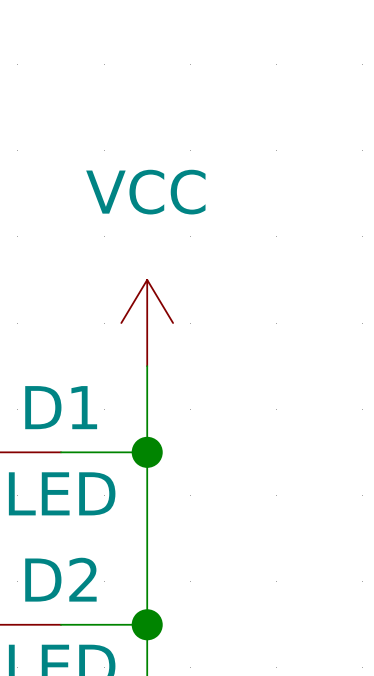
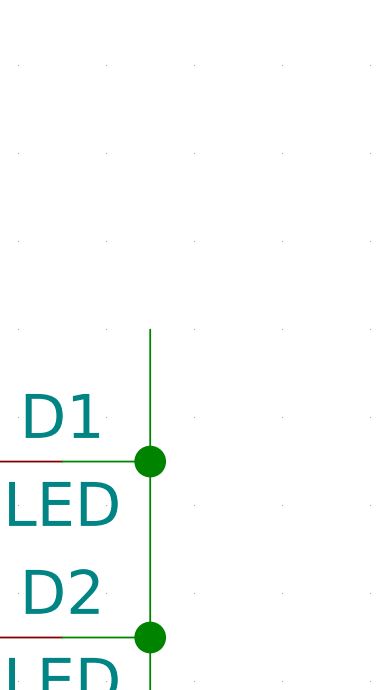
power symbol: VCC (147, 323) -> none

